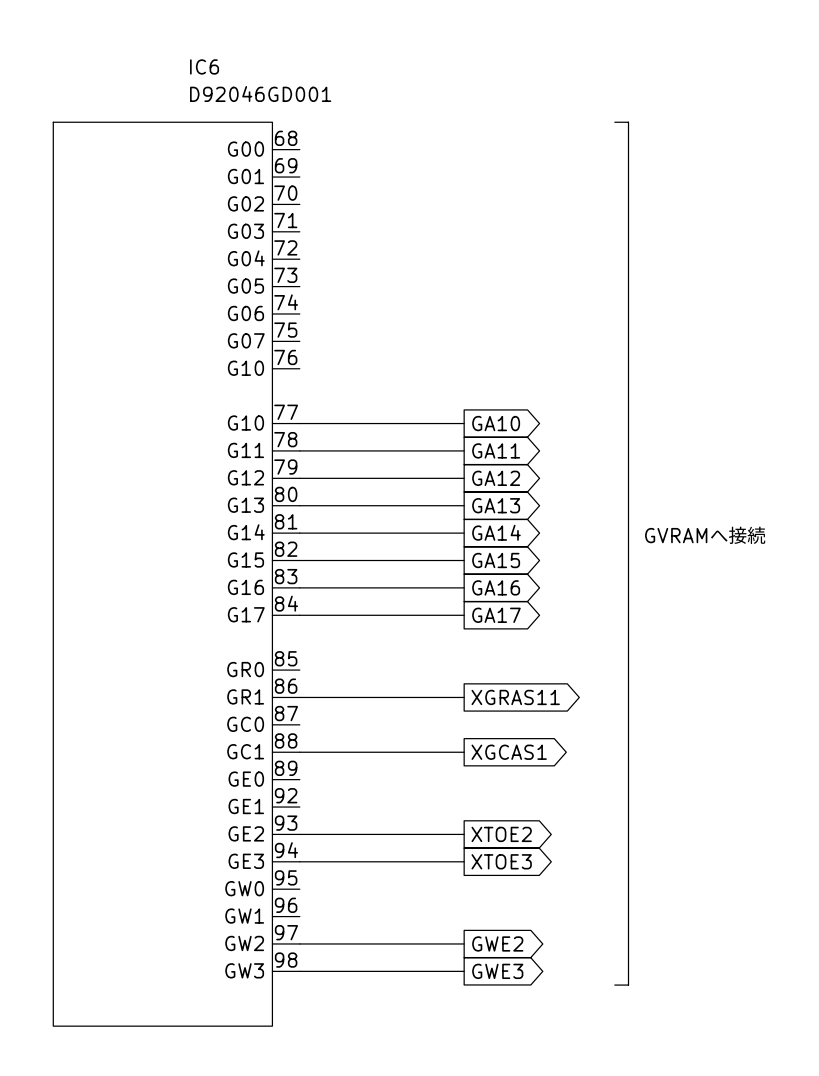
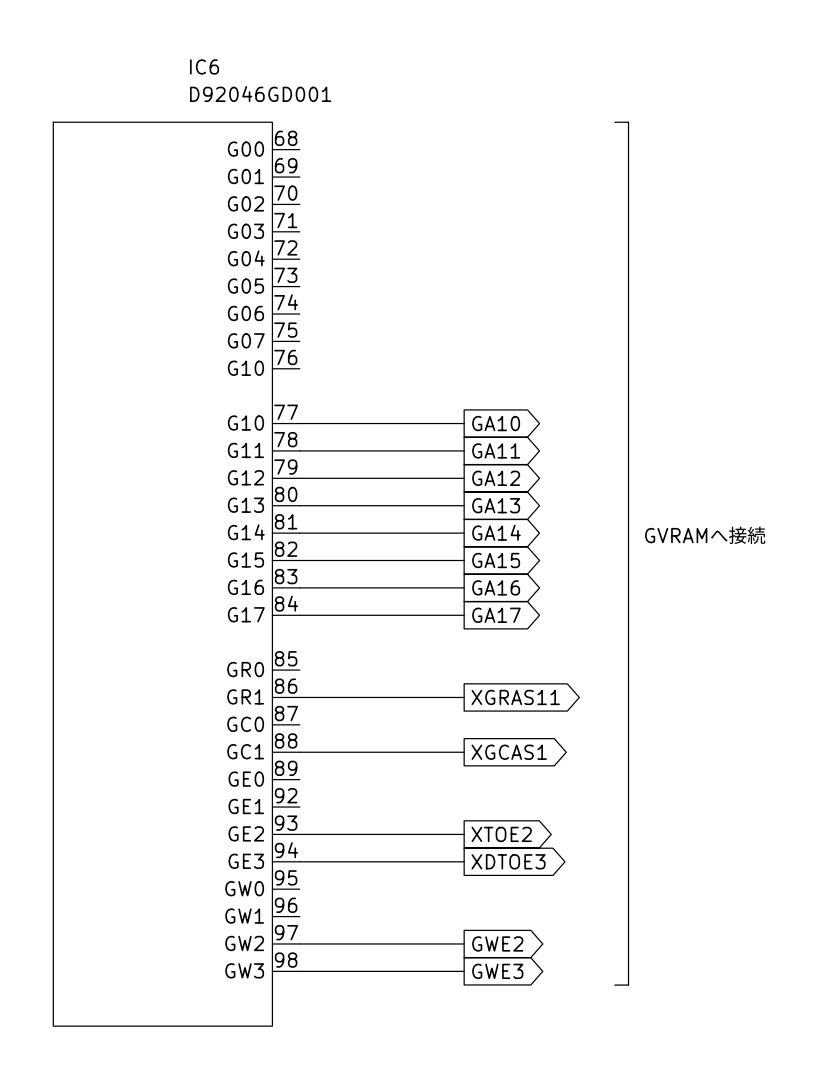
global label: XTOE3 (501, 861) -> XDTOE3 (508, 861)

